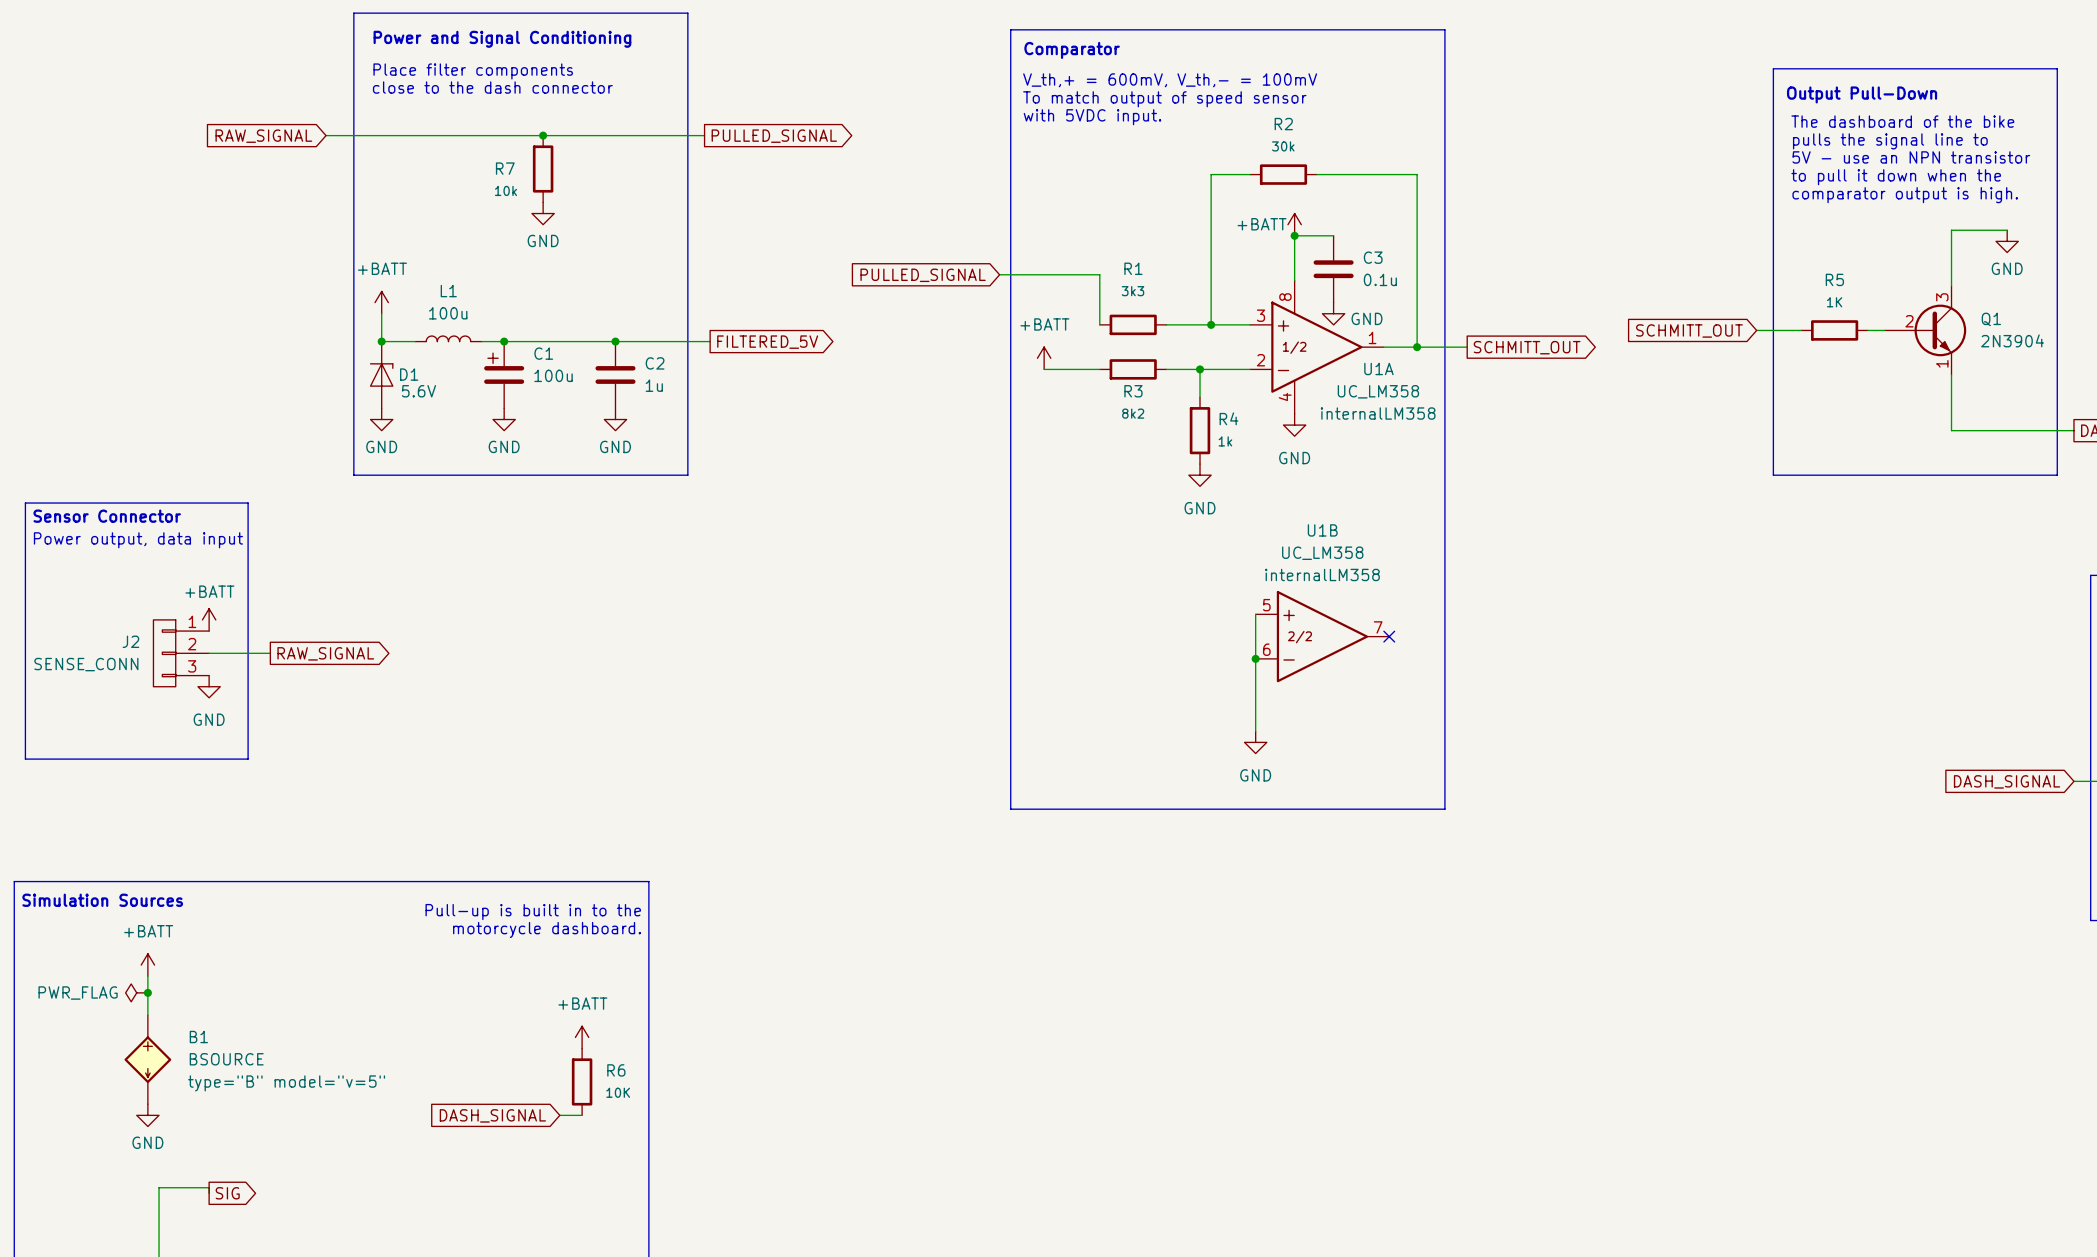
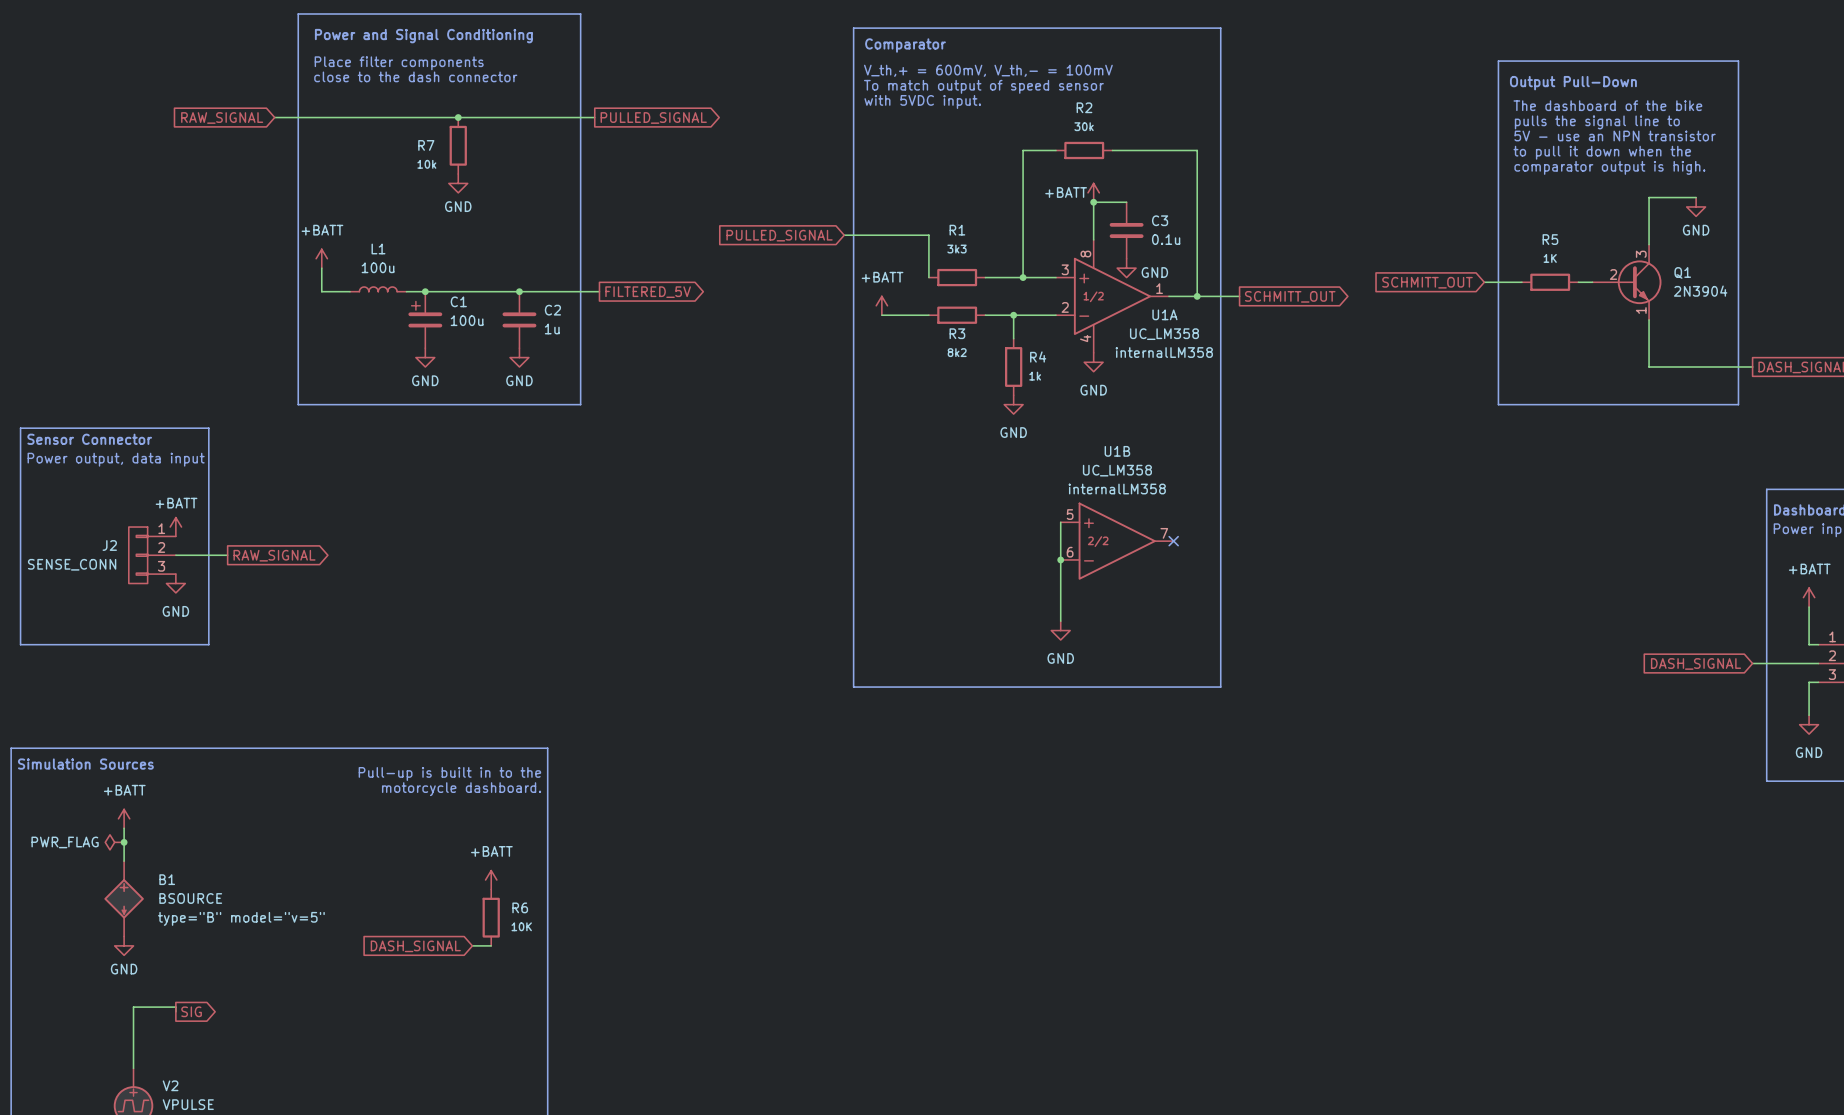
junction: (381, 341) -> none
D1: 5.6V (381, 374) -> none
power symbol: GND (381, 419) -> none

